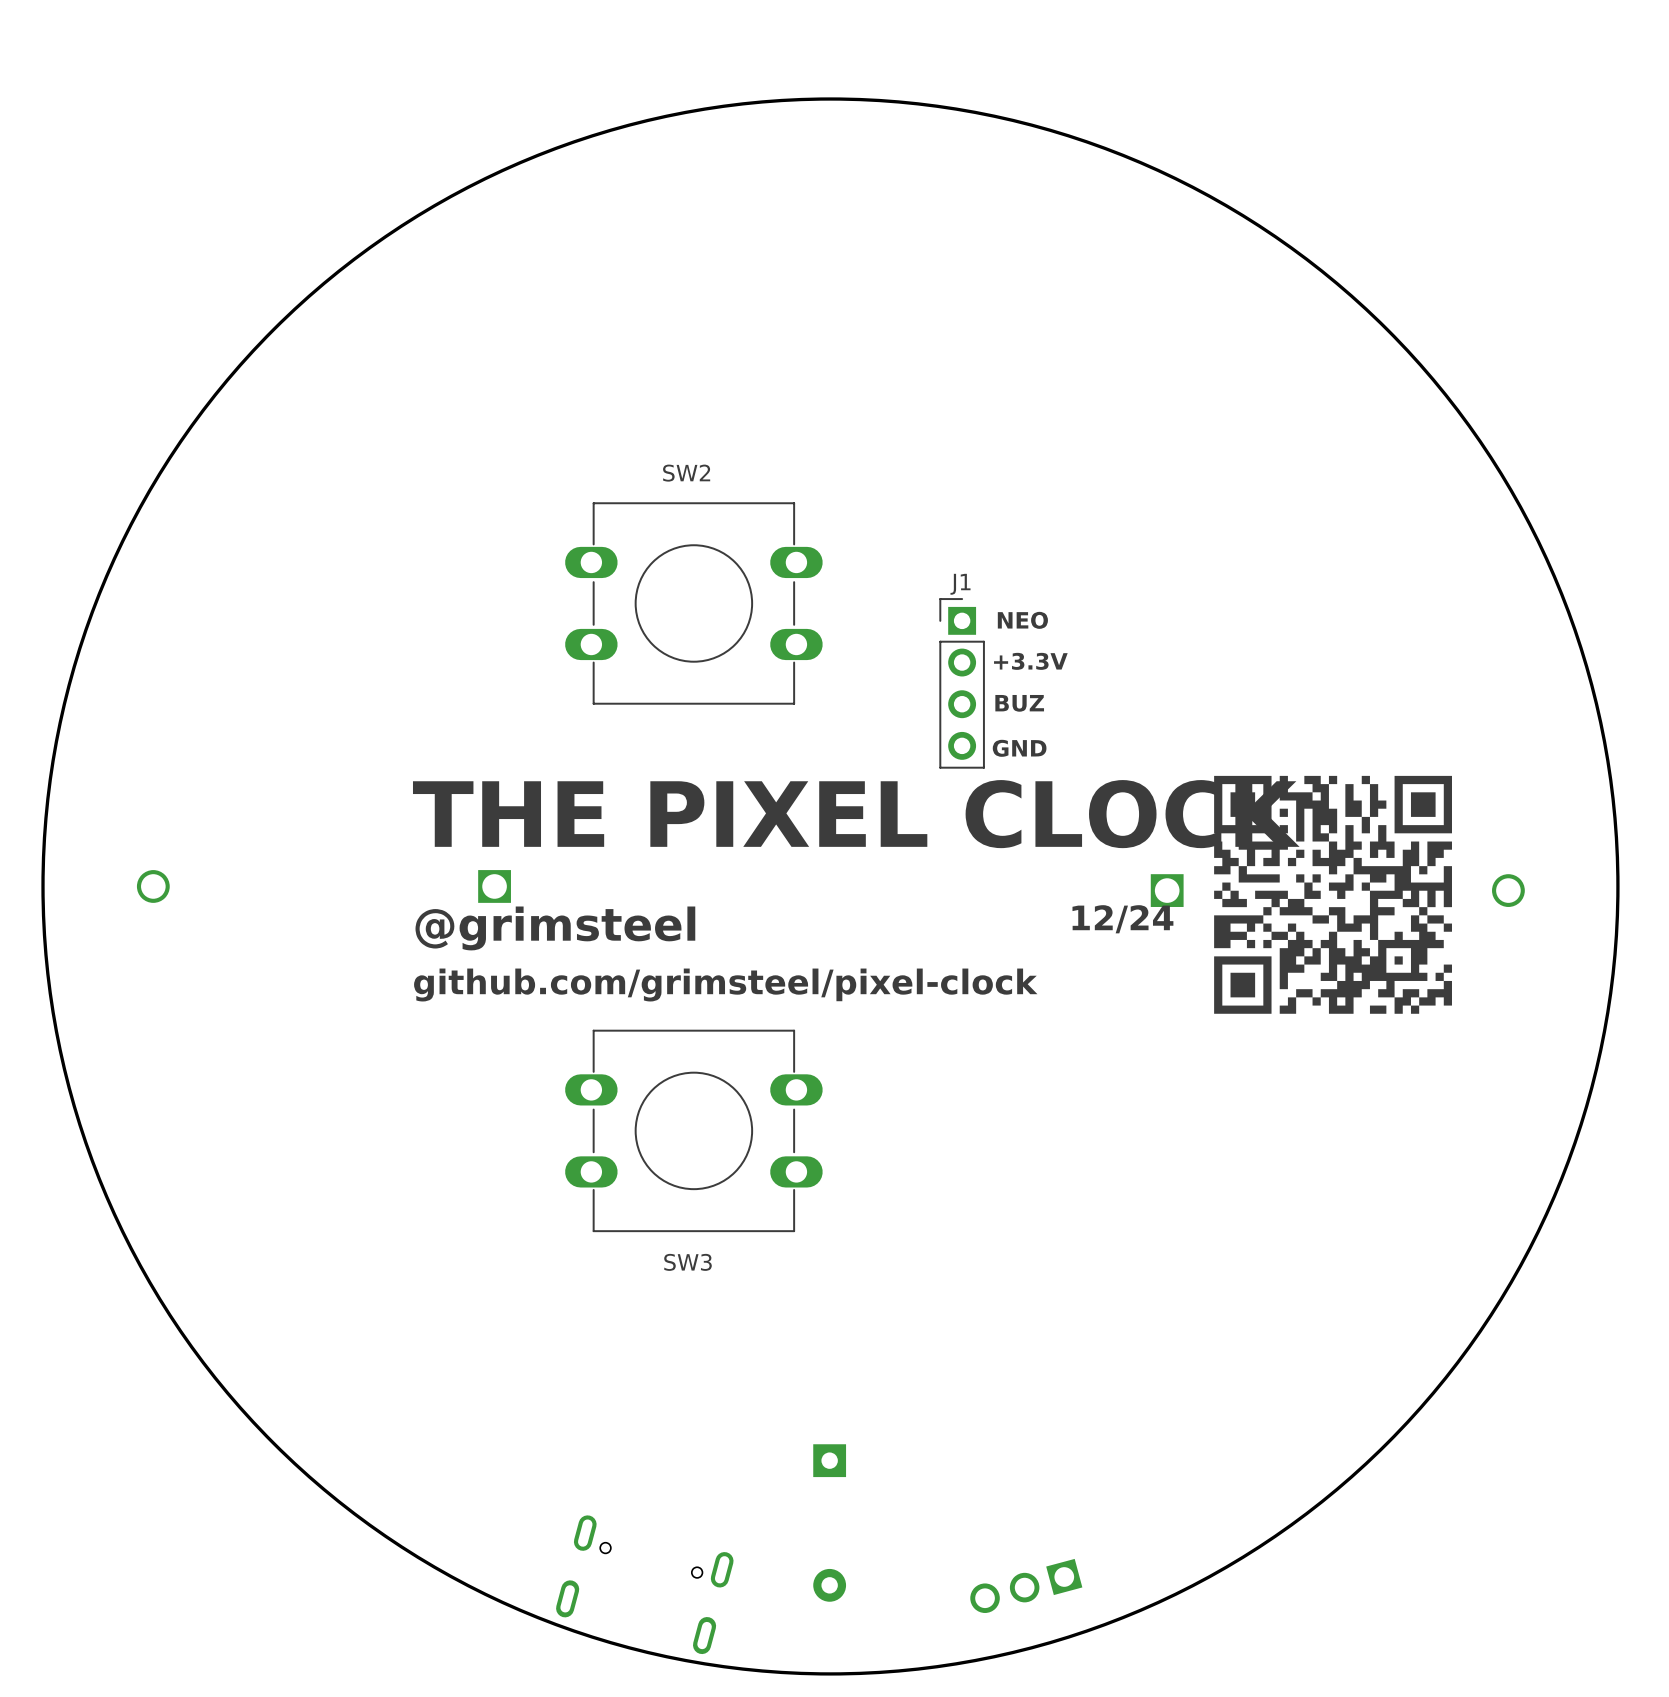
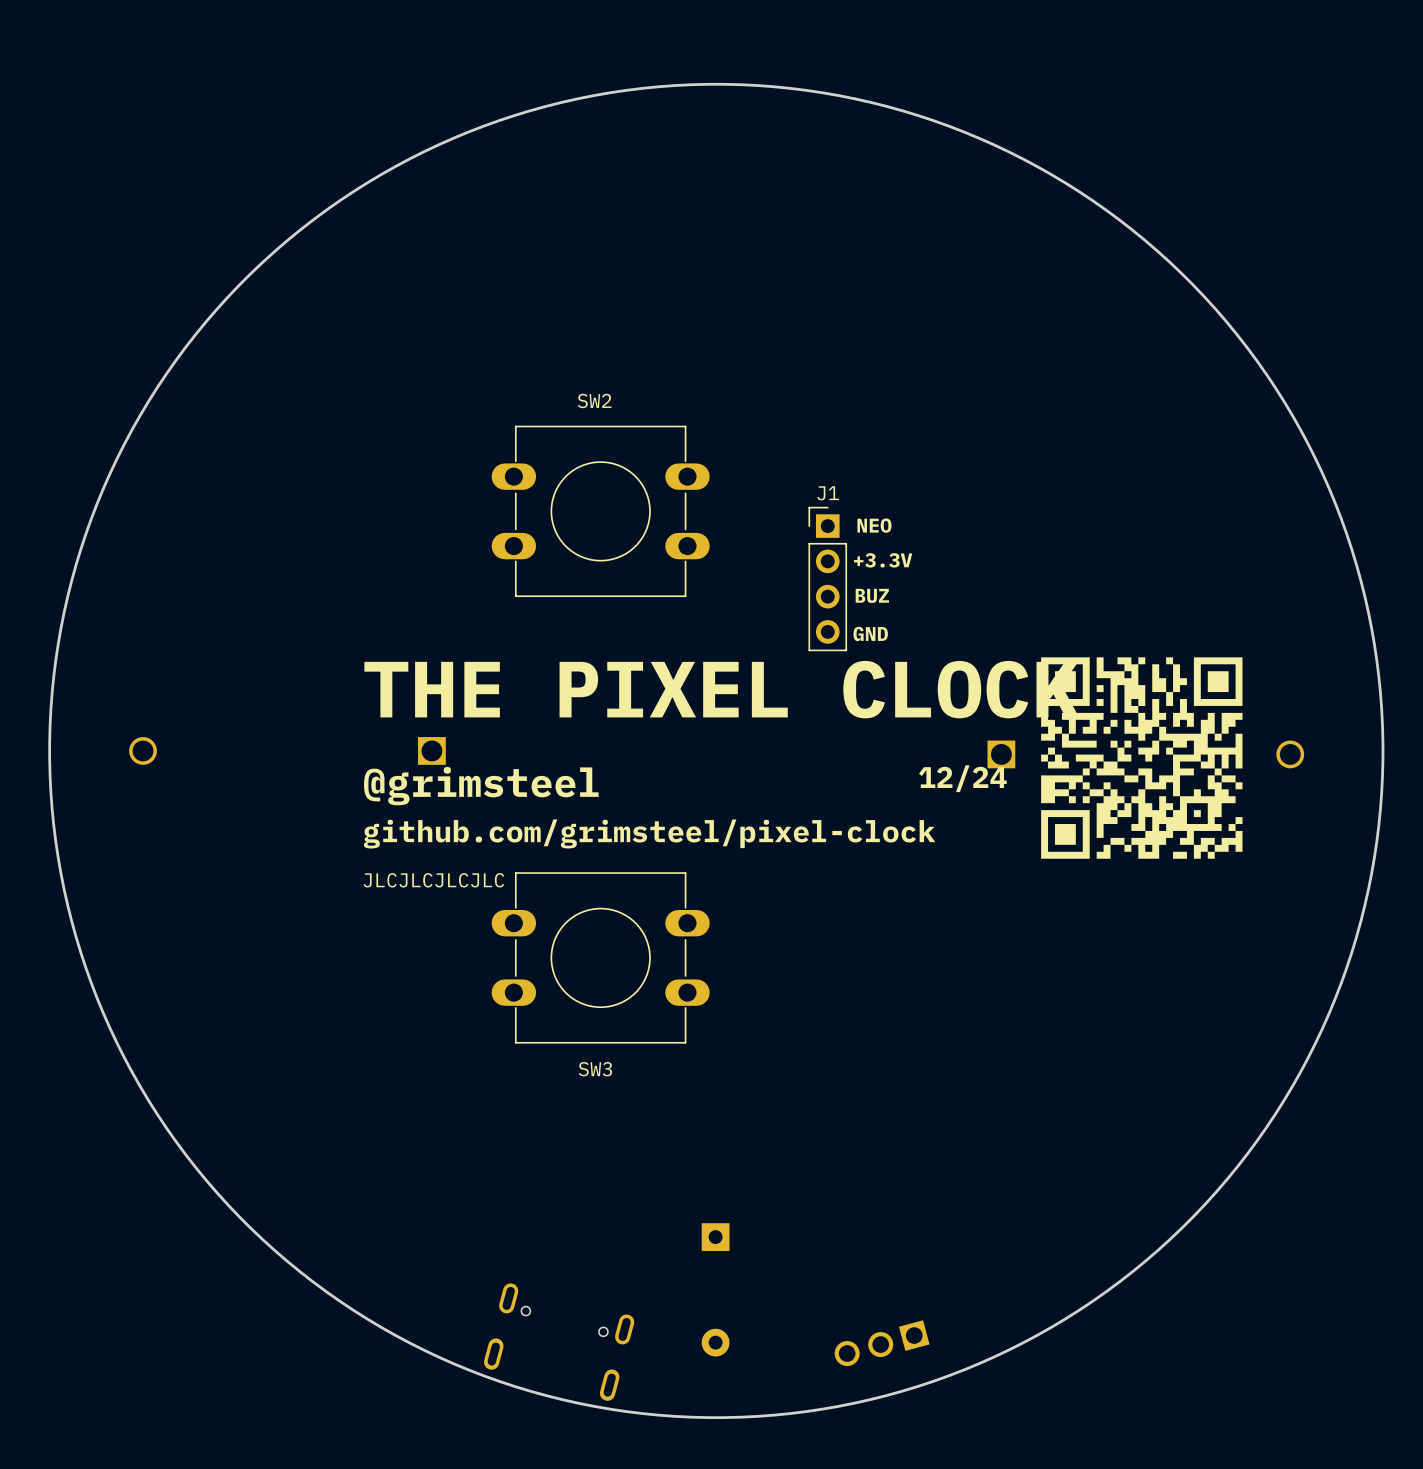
text: none -> JLCJLCJLCJLC (433, 880)

